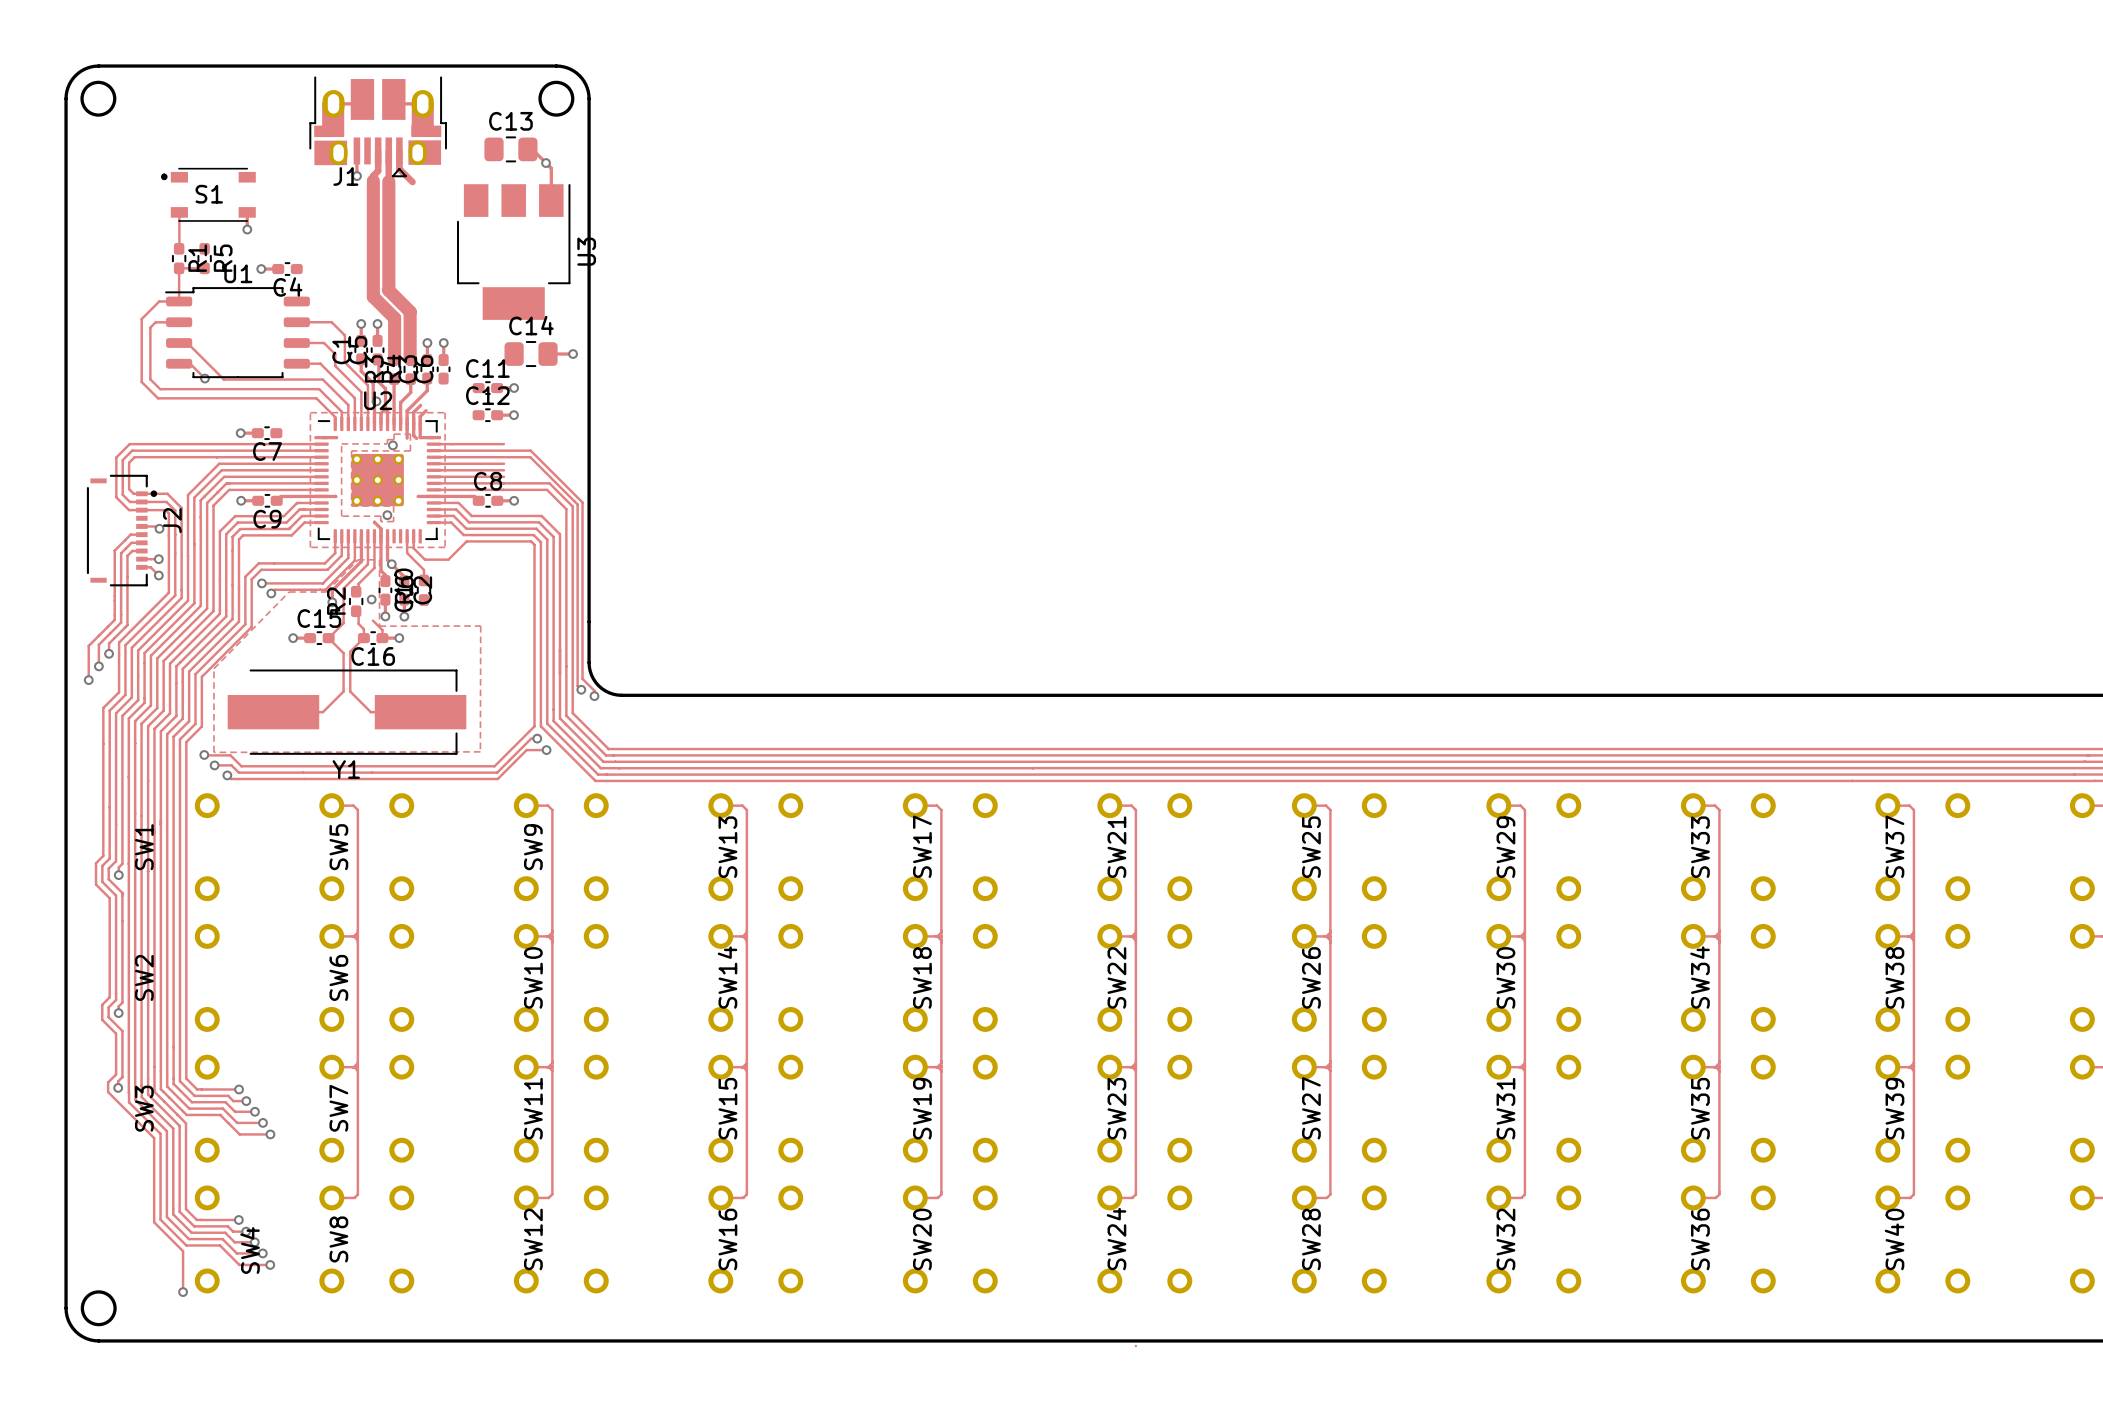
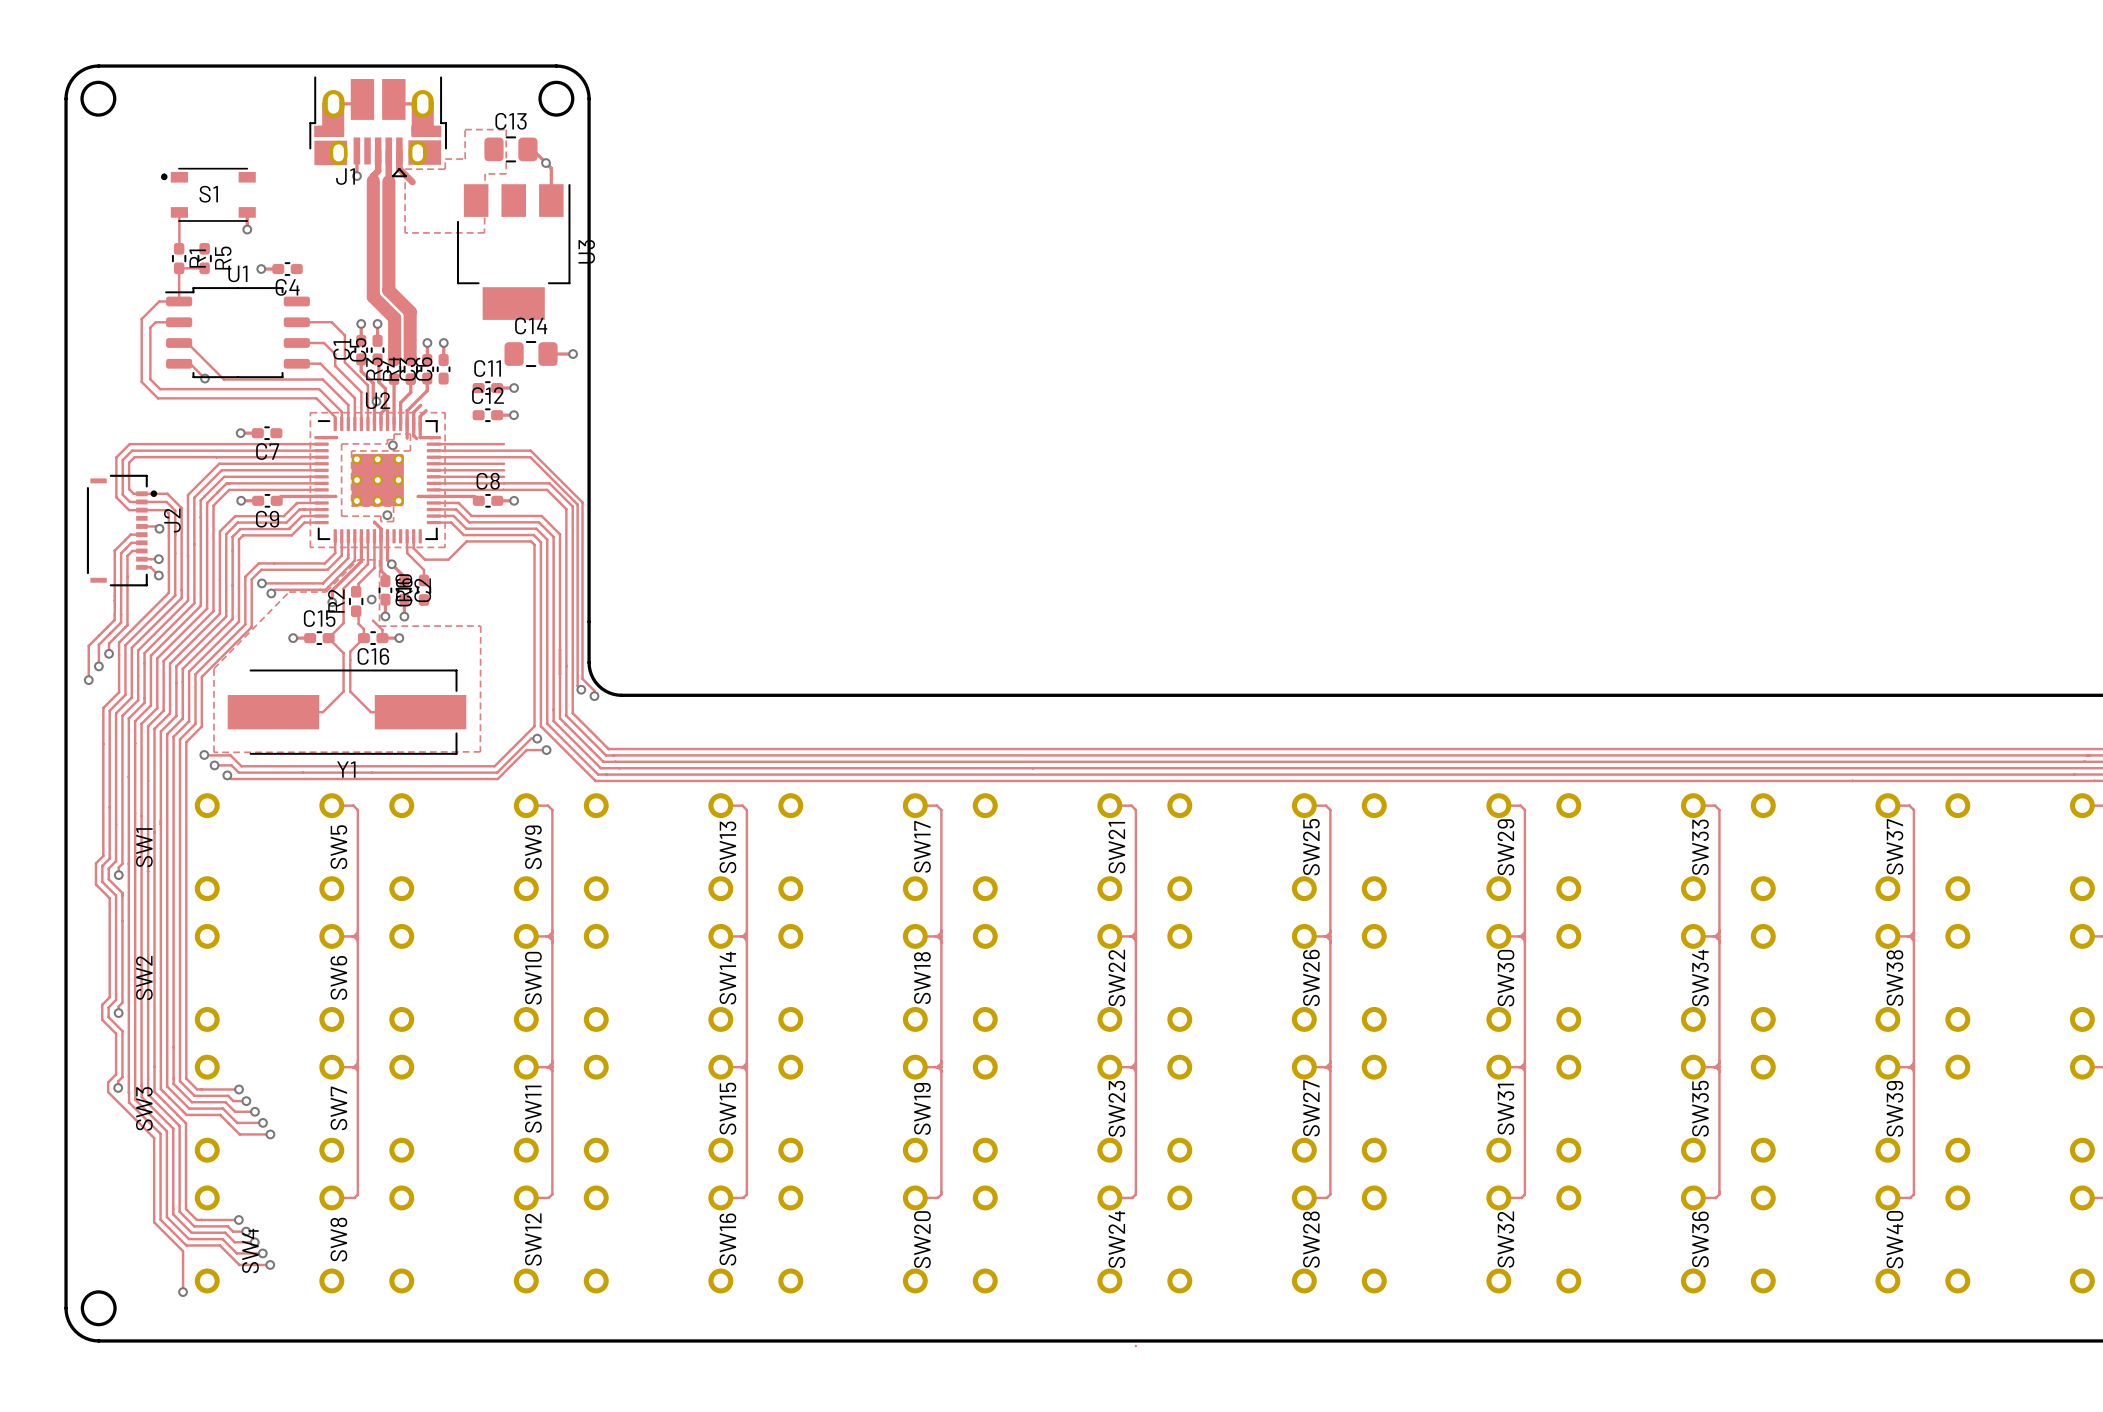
zone outline: none -> (465, 129) (465, 159) (445, 159) (445, 169) (405, 169) (405, 232) (484, 232) (485, 173) (506, 173) (506, 129) (465, 129)

